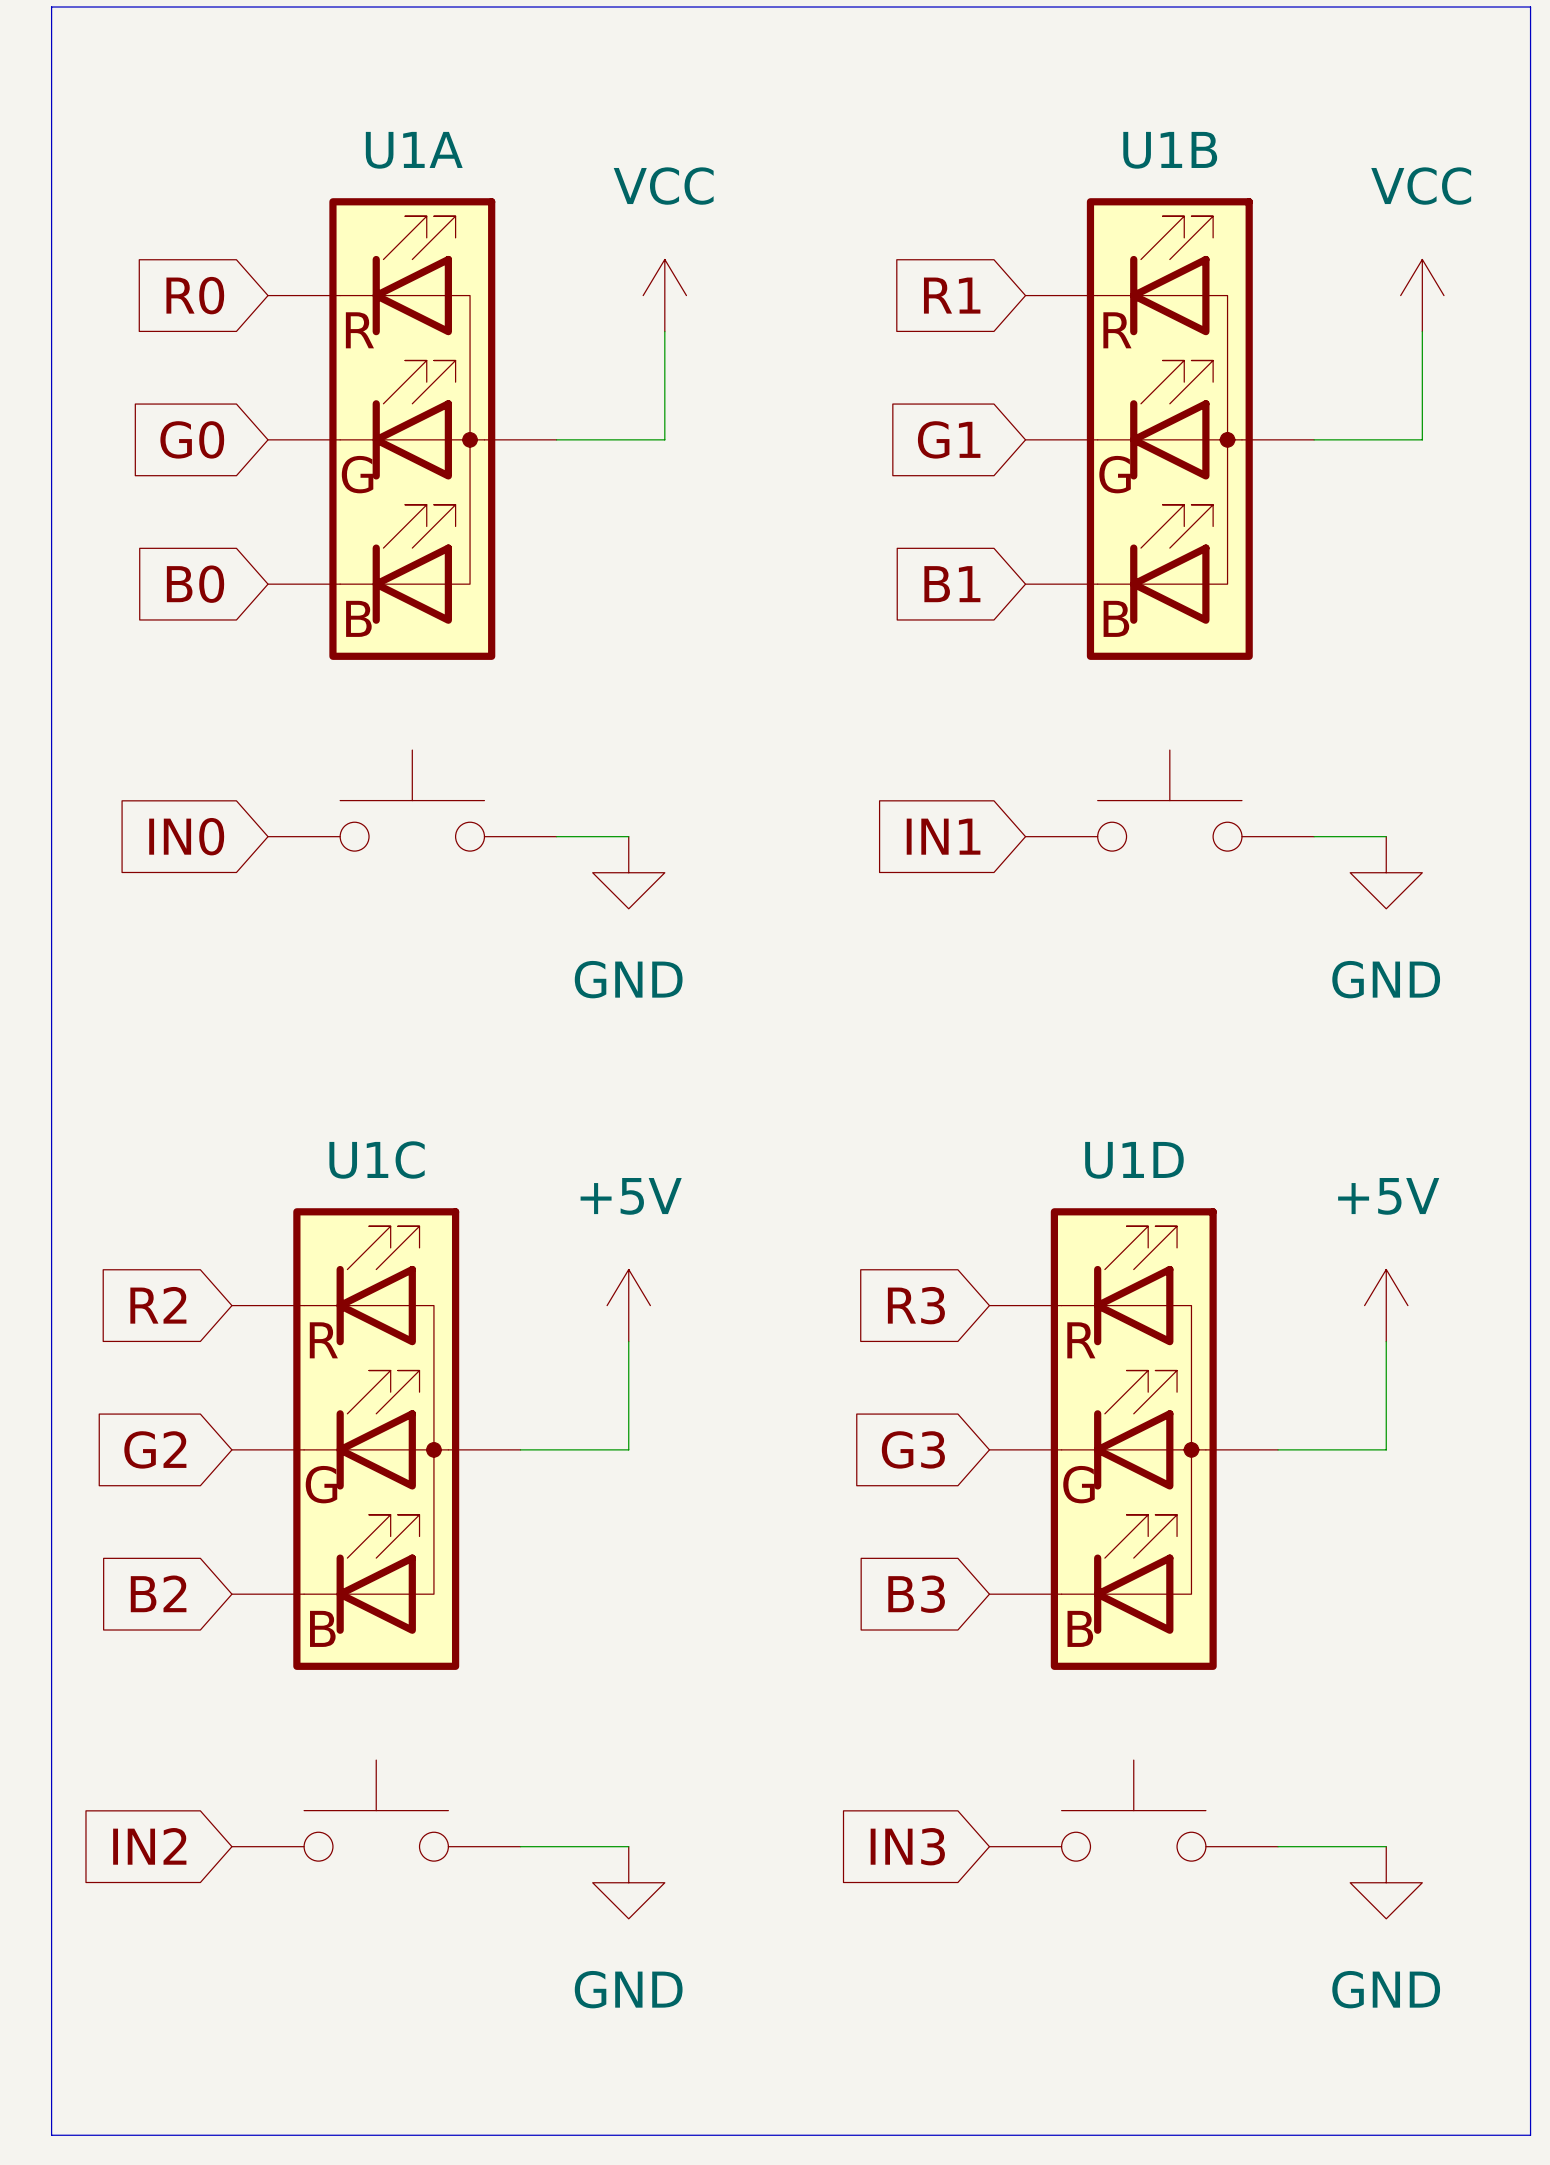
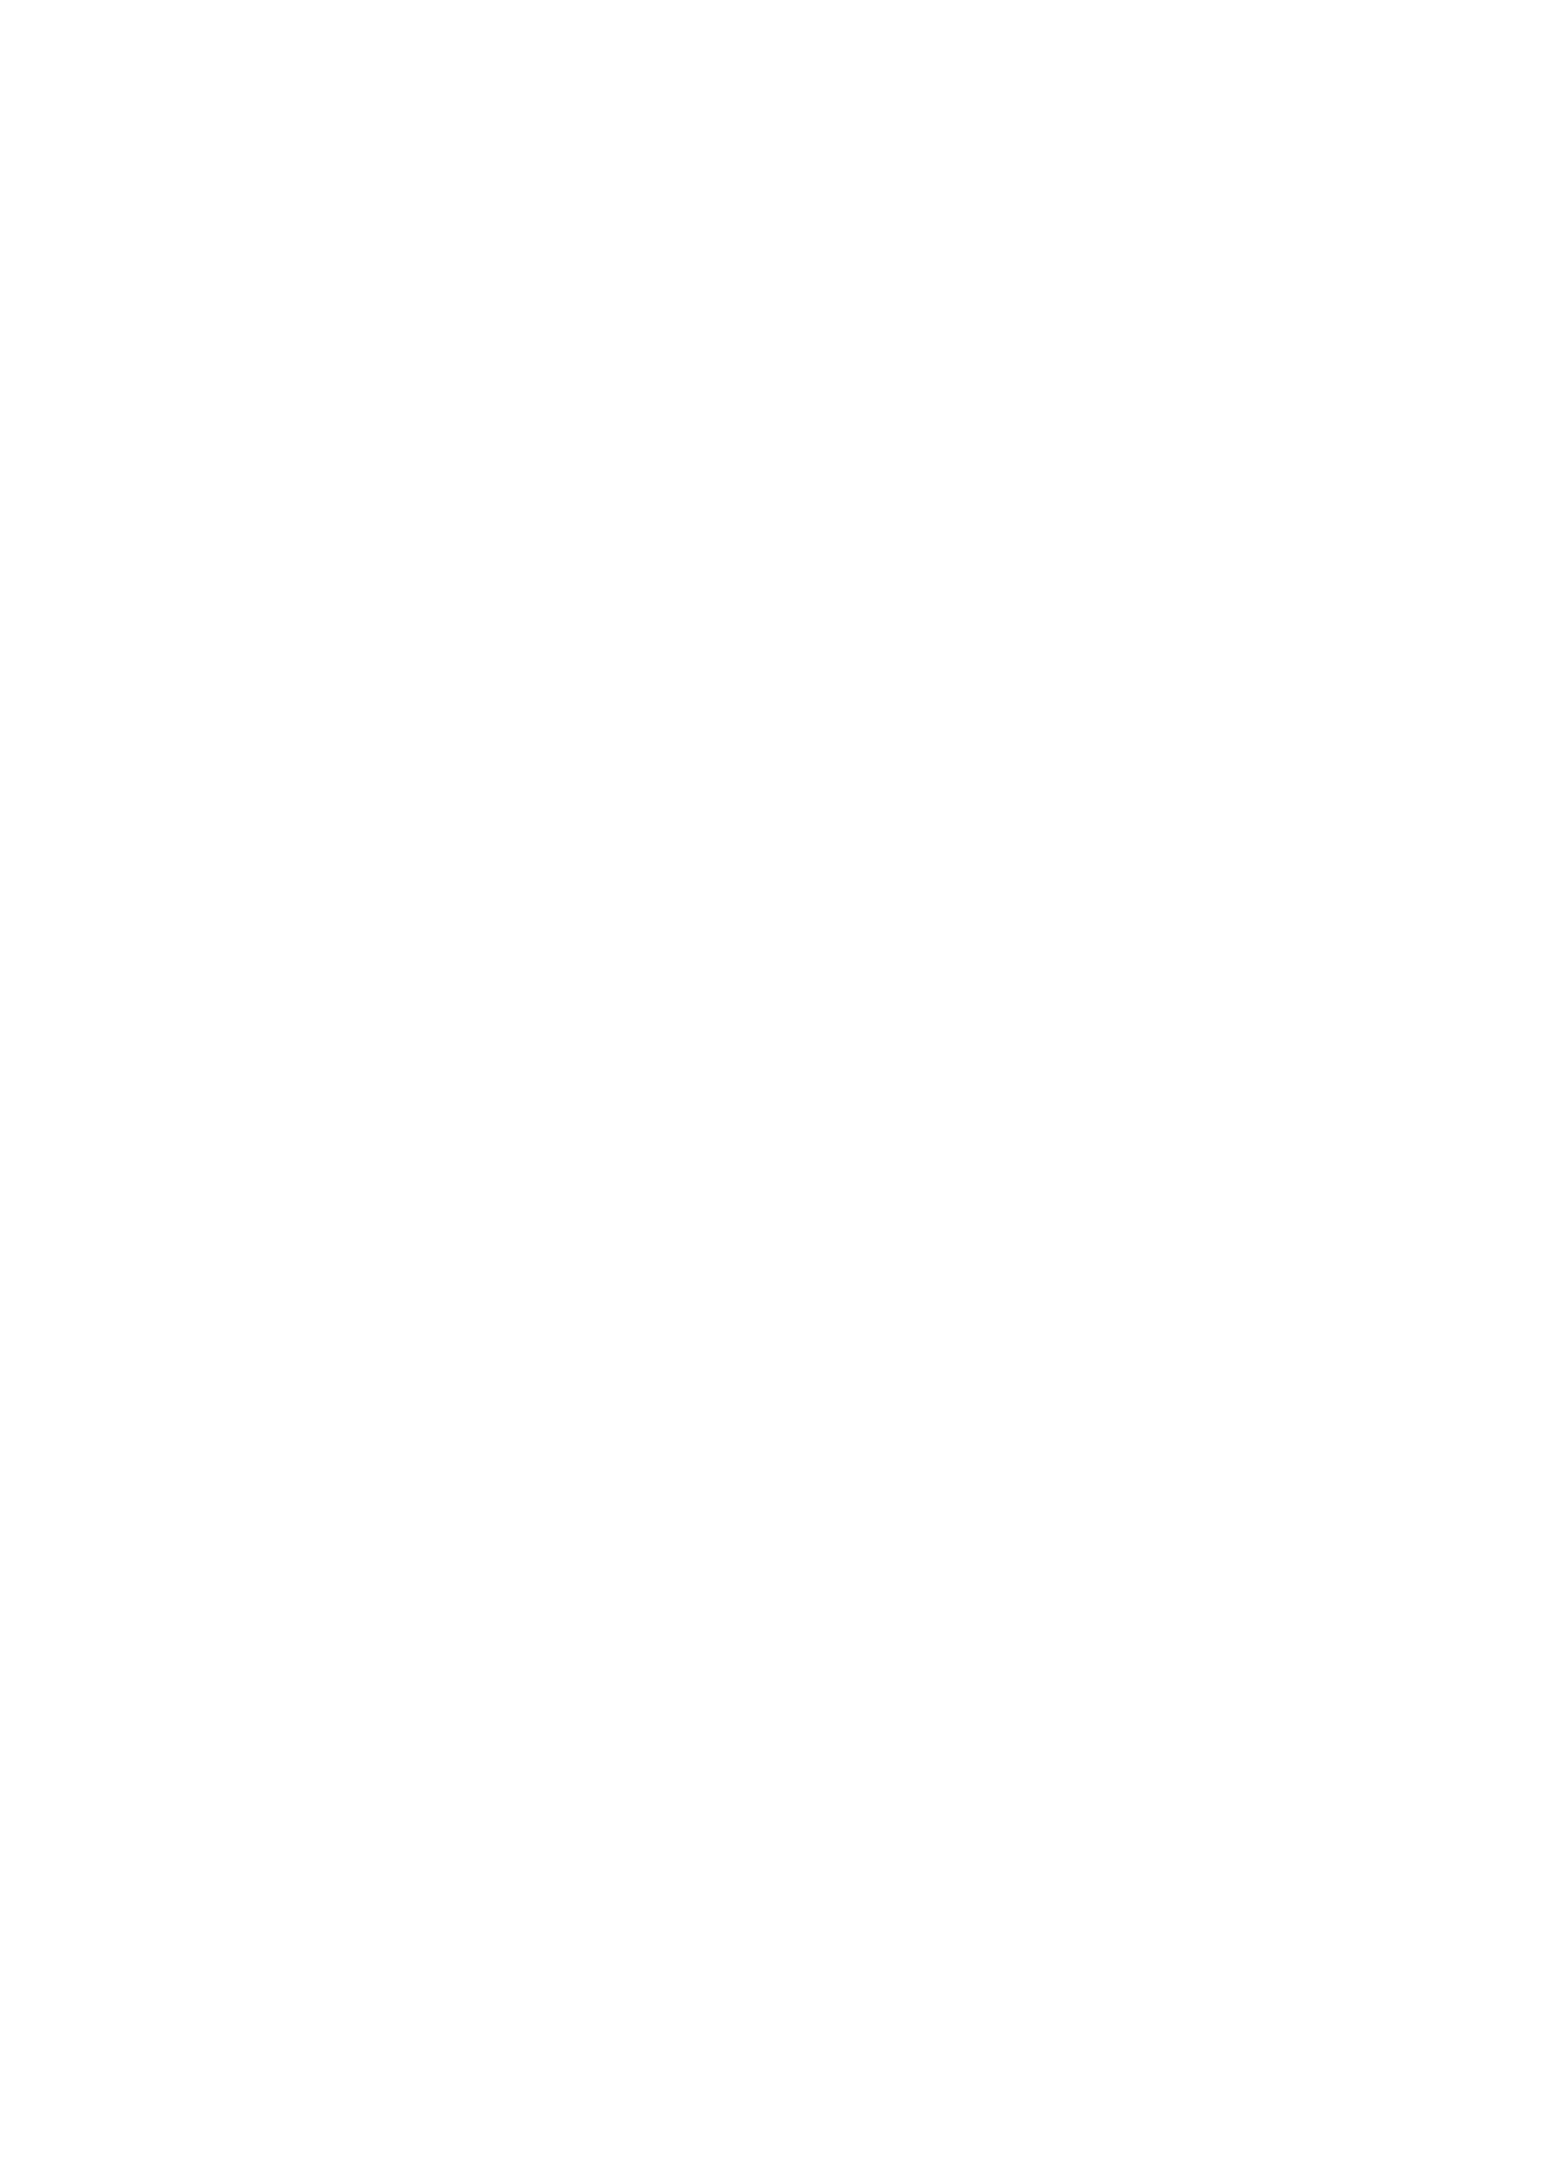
line: (51, 7) (1530, 7) (1530, 2135) (51, 2135) (51, 7) -> none
global label: R0 (195, 295) -> none
power symbol: VCC (664, 295) -> none
global label: R1 (952, 295) -> none
power symbol: VCC (1422, 295) -> none
wire: (664, 331) (664, 439) (556, 439) -> none
wire: (1422, 331) (1422, 439) (1314, 439) -> none
global label: G0 (192, 439) -> none
global label: G1 (949, 439) -> none
U1A: (412, 524) -> none
U1B: (1169, 524) -> none
global label: B0 (195, 584) -> none
global label: B1 (952, 584) -> none
global label: IN0 (186, 836) -> none
wire: (556, 836) (628, 836) -> none
global label: IN1 (943, 836) -> none
wire: (1314, 836) (1386, 836) -> none
power symbol: GND (628, 872) -> none
power symbol: GND (1386, 872) -> none
global label: R2 (158, 1305) -> none
power symbol: +5V (628, 1305) -> none
global label: R3 (916, 1305) -> none
power symbol: +5V (1386, 1305) -> none
wire: (628, 1341) (628, 1449) (520, 1449) -> none
wire: (1386, 1341) (1386, 1449) (1278, 1449) -> none
global label: G2 (155, 1449) -> none
global label: G3 (913, 1449) -> none
U1C: (376, 1534) -> none
U1D: (1133, 1534) -> none
global label: B2 (158, 1593) -> none
global label: B3 (916, 1594) -> none
global label: IN2 (149, 1846) -> none
wire: (520, 1846) (628, 1846) -> none
global label: IN3 (907, 1846) -> none
wire: (1278, 1846) (1386, 1846) -> none
power symbol: GND (628, 1882) -> none
power symbol: GND (1386, 1882) -> none

